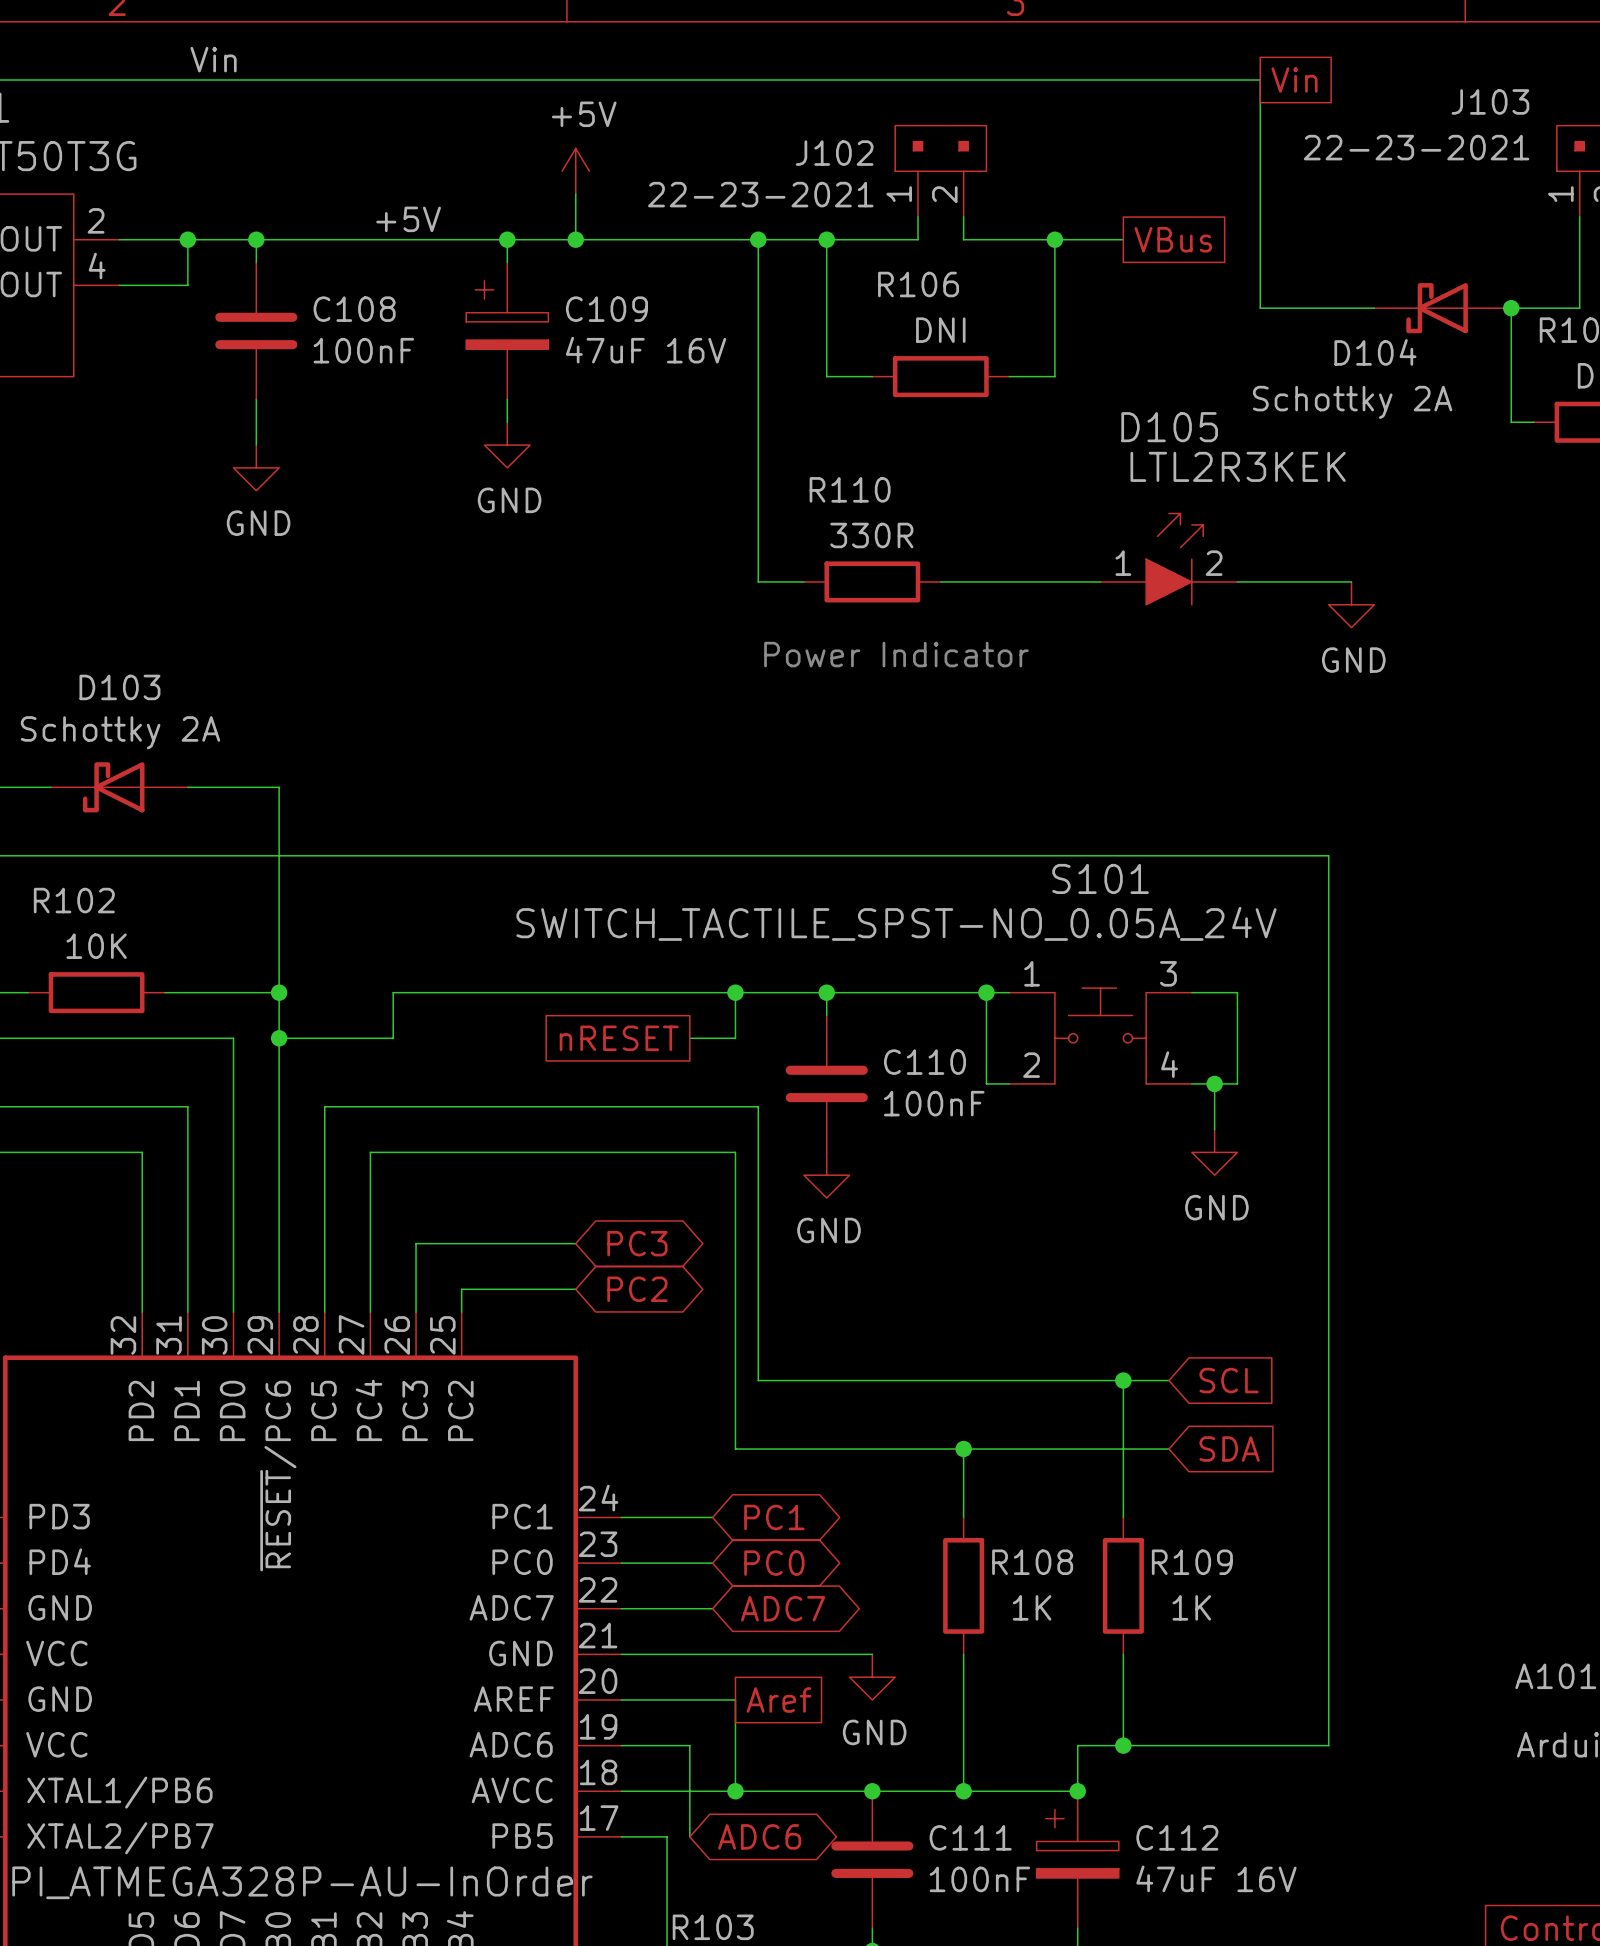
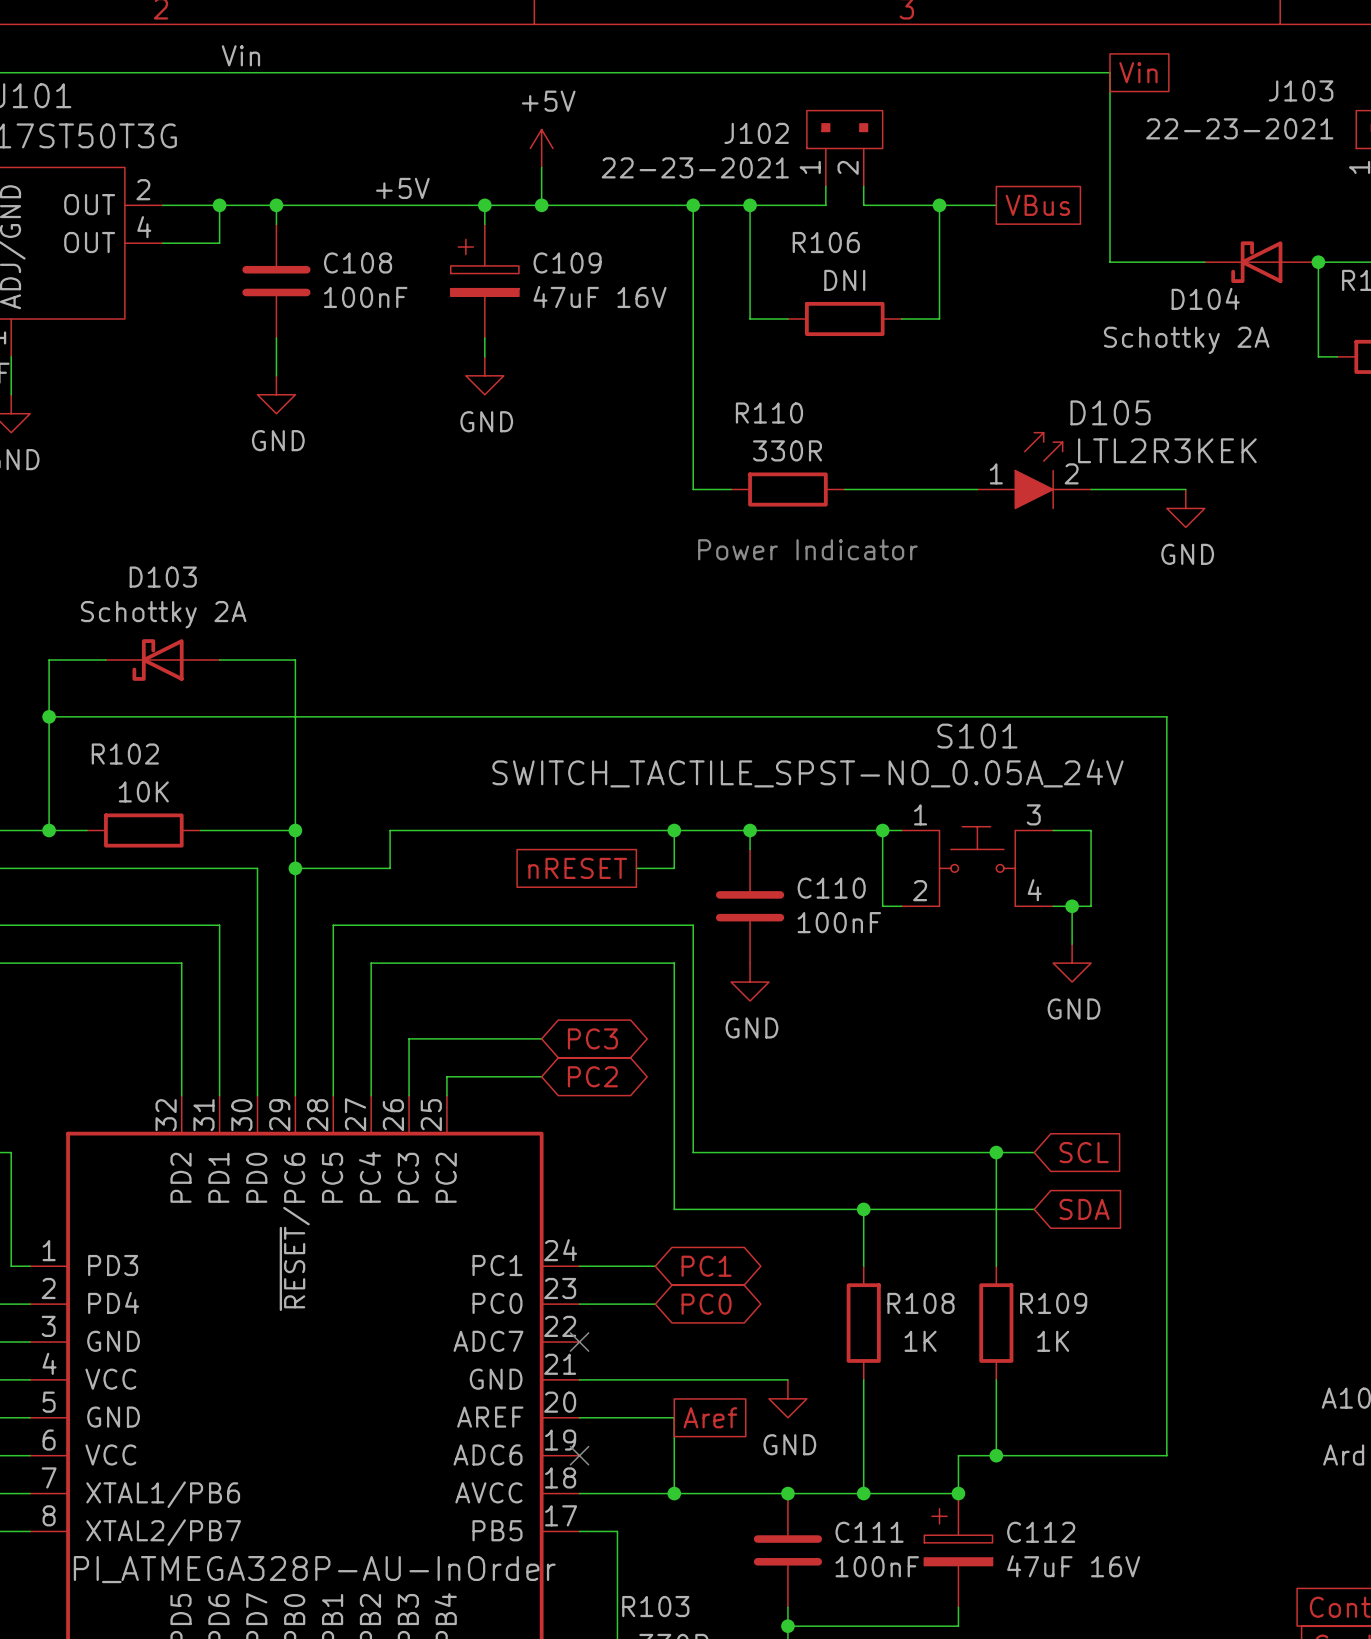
D105 name position: D105 (1169, 427) -> D105 (1110, 412)
D105 value position: LTL2R3KEK (1238, 466) -> LTL2R3KEK (1167, 450)
wire: (621, 1608) (712, 1608) -> none
no-connect mark: none -> (579, 1342)
global label: ADC7 (783, 1608) -> none
wire: (621, 1745) (689, 1745) (689, 1836) -> none
no-connect mark: none -> (579, 1455)
global label: ADC6 (759, 1836) -> none

